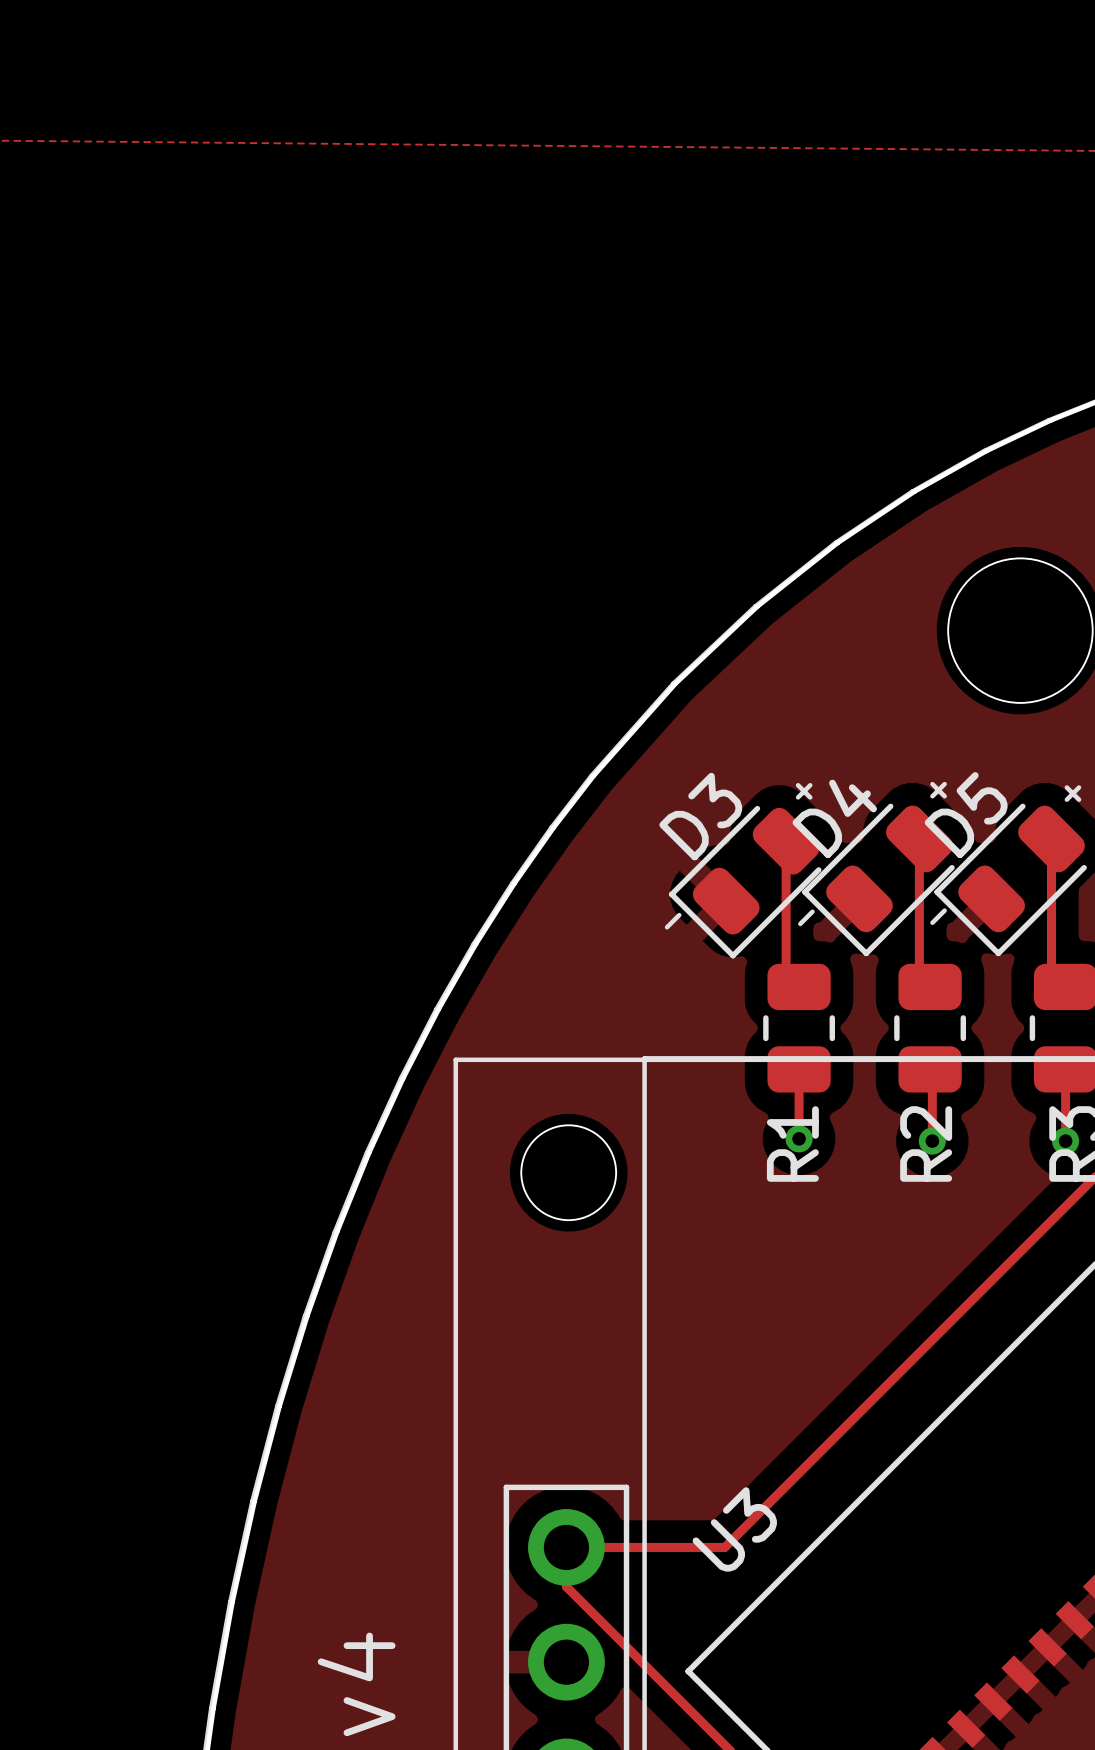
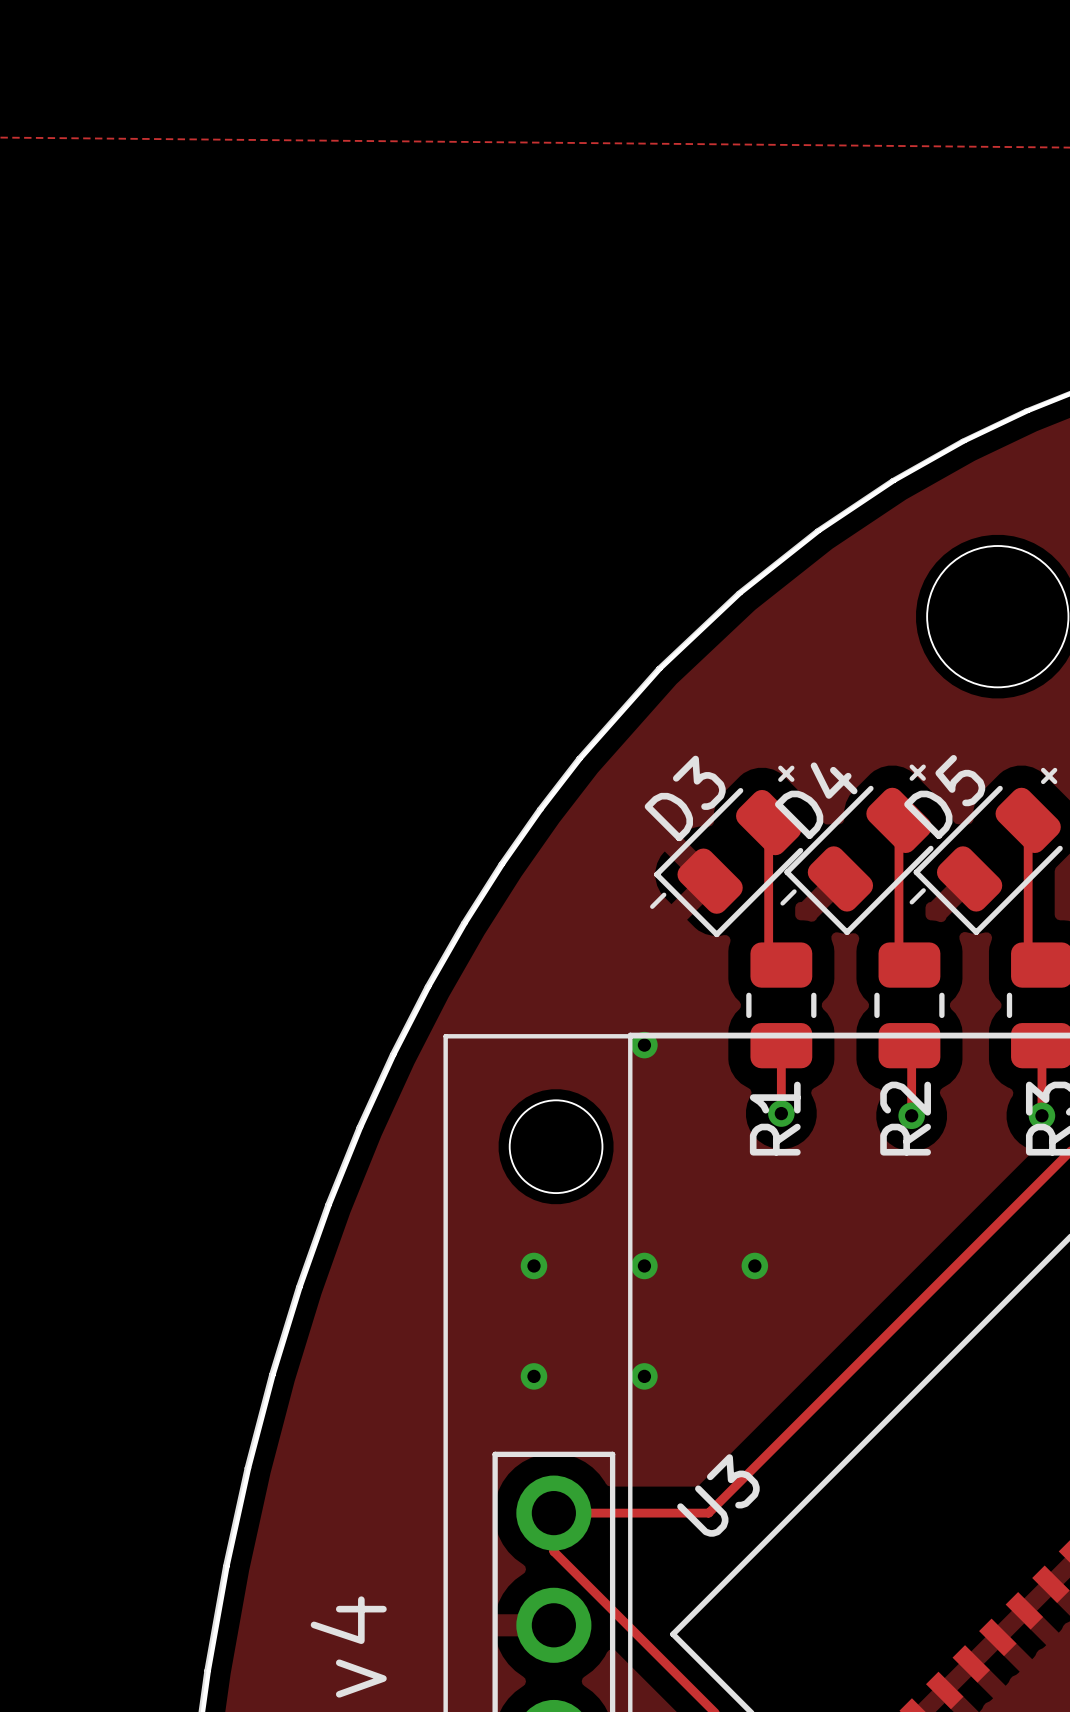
via: none -> (644, 1045)
via: none -> (534, 1265)
via: none -> (644, 1265)
via: none -> (754, 1265)
via: none -> (534, 1376)
via: none -> (644, 1376)

